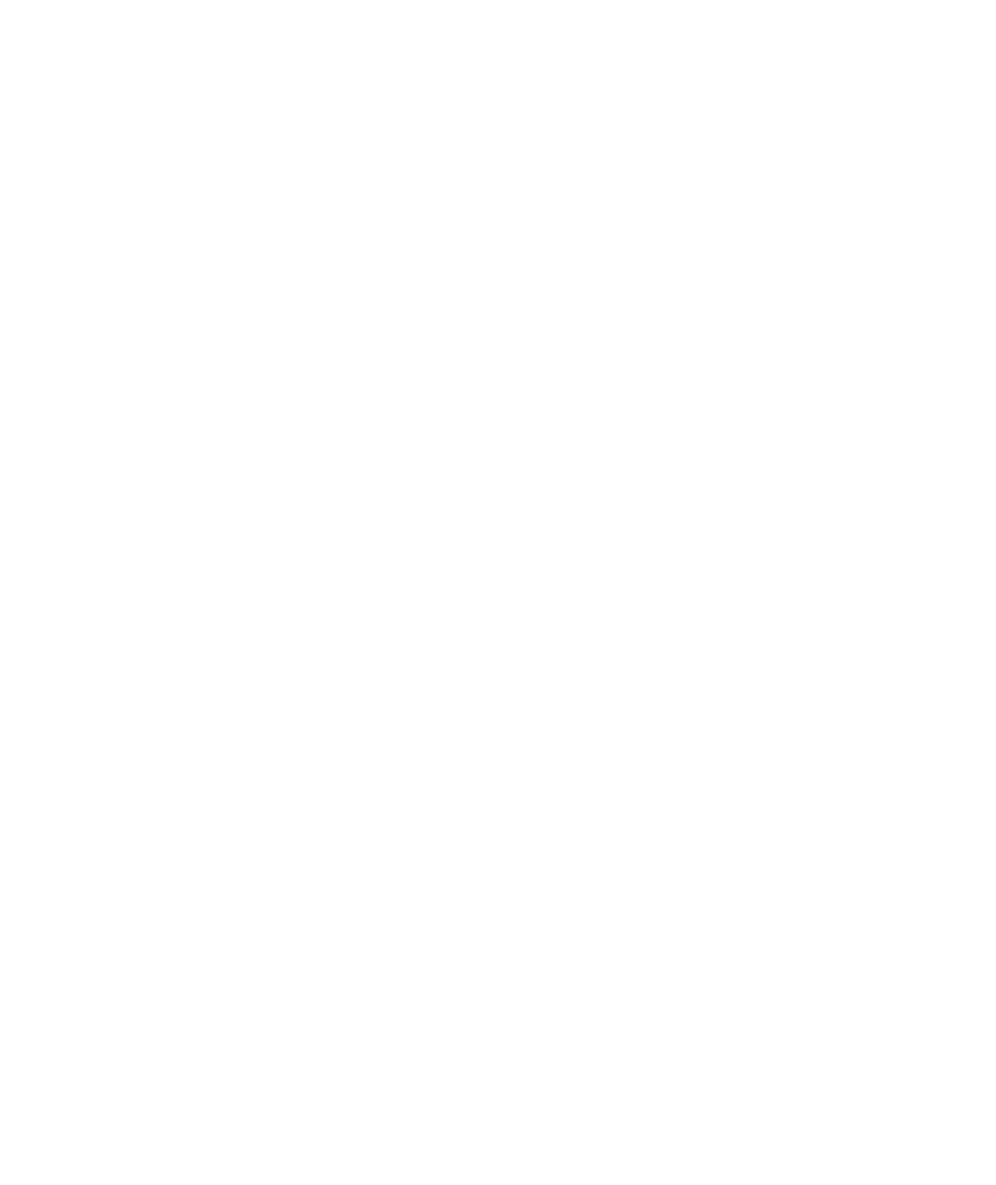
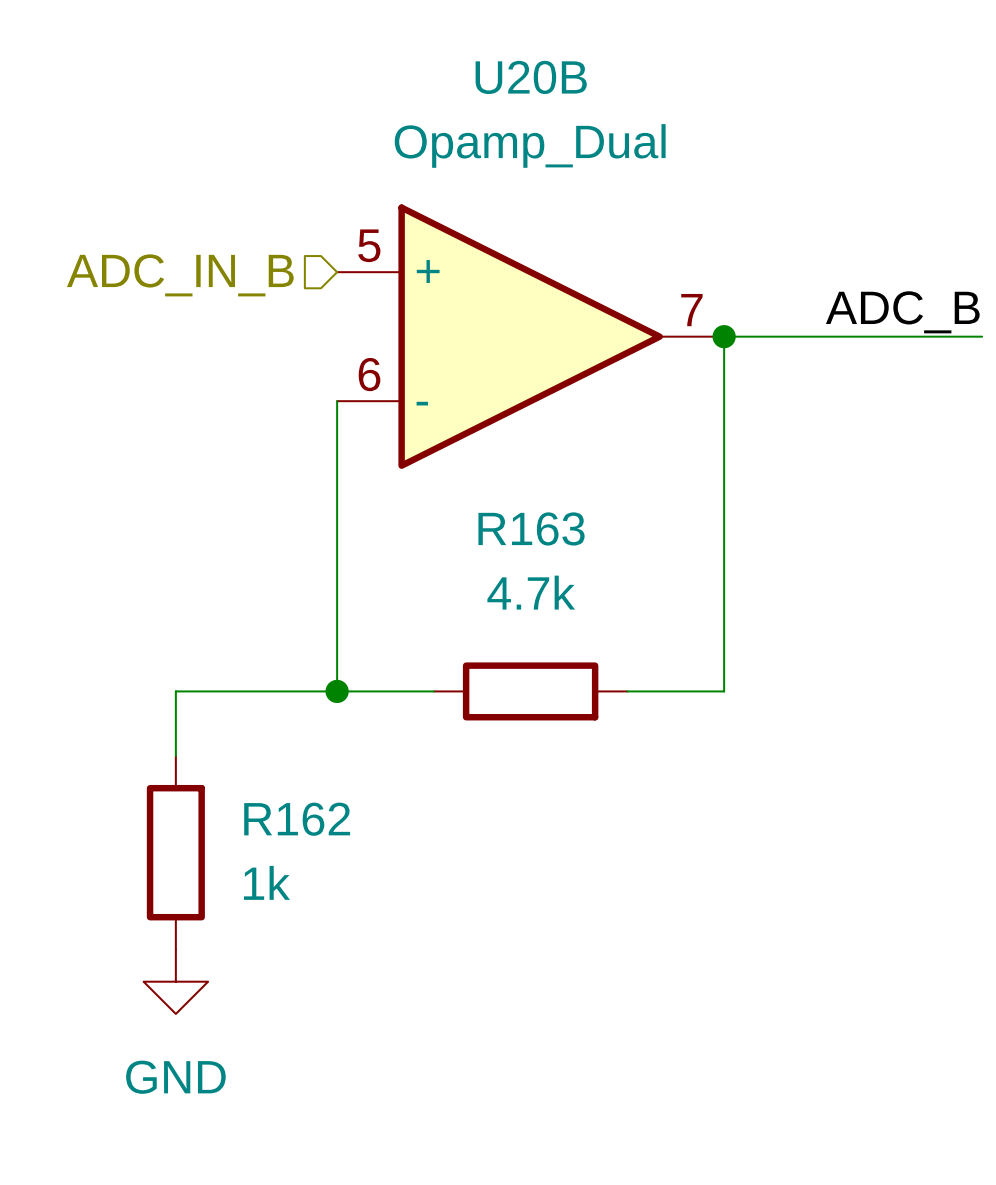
hierarchical label: none -> ADC_IN_B (180, 275)
label: none -> ADC_B (902, 312)
U20B: none -> Opamp_Dual (530, 336)
junction: none -> (724, 336)
wire: none -> (982, 336) (724, 336) (724, 691) (627, 691)
wire: none -> (337, 401) (337, 691)
junction: none -> (337, 691)
wire: none -> (433, 691) (175, 691) (175, 755)
R163: none -> 4.7k (530, 691)
R162: none -> 1k (175, 852)
power symbol: none -> GND (175, 981)

